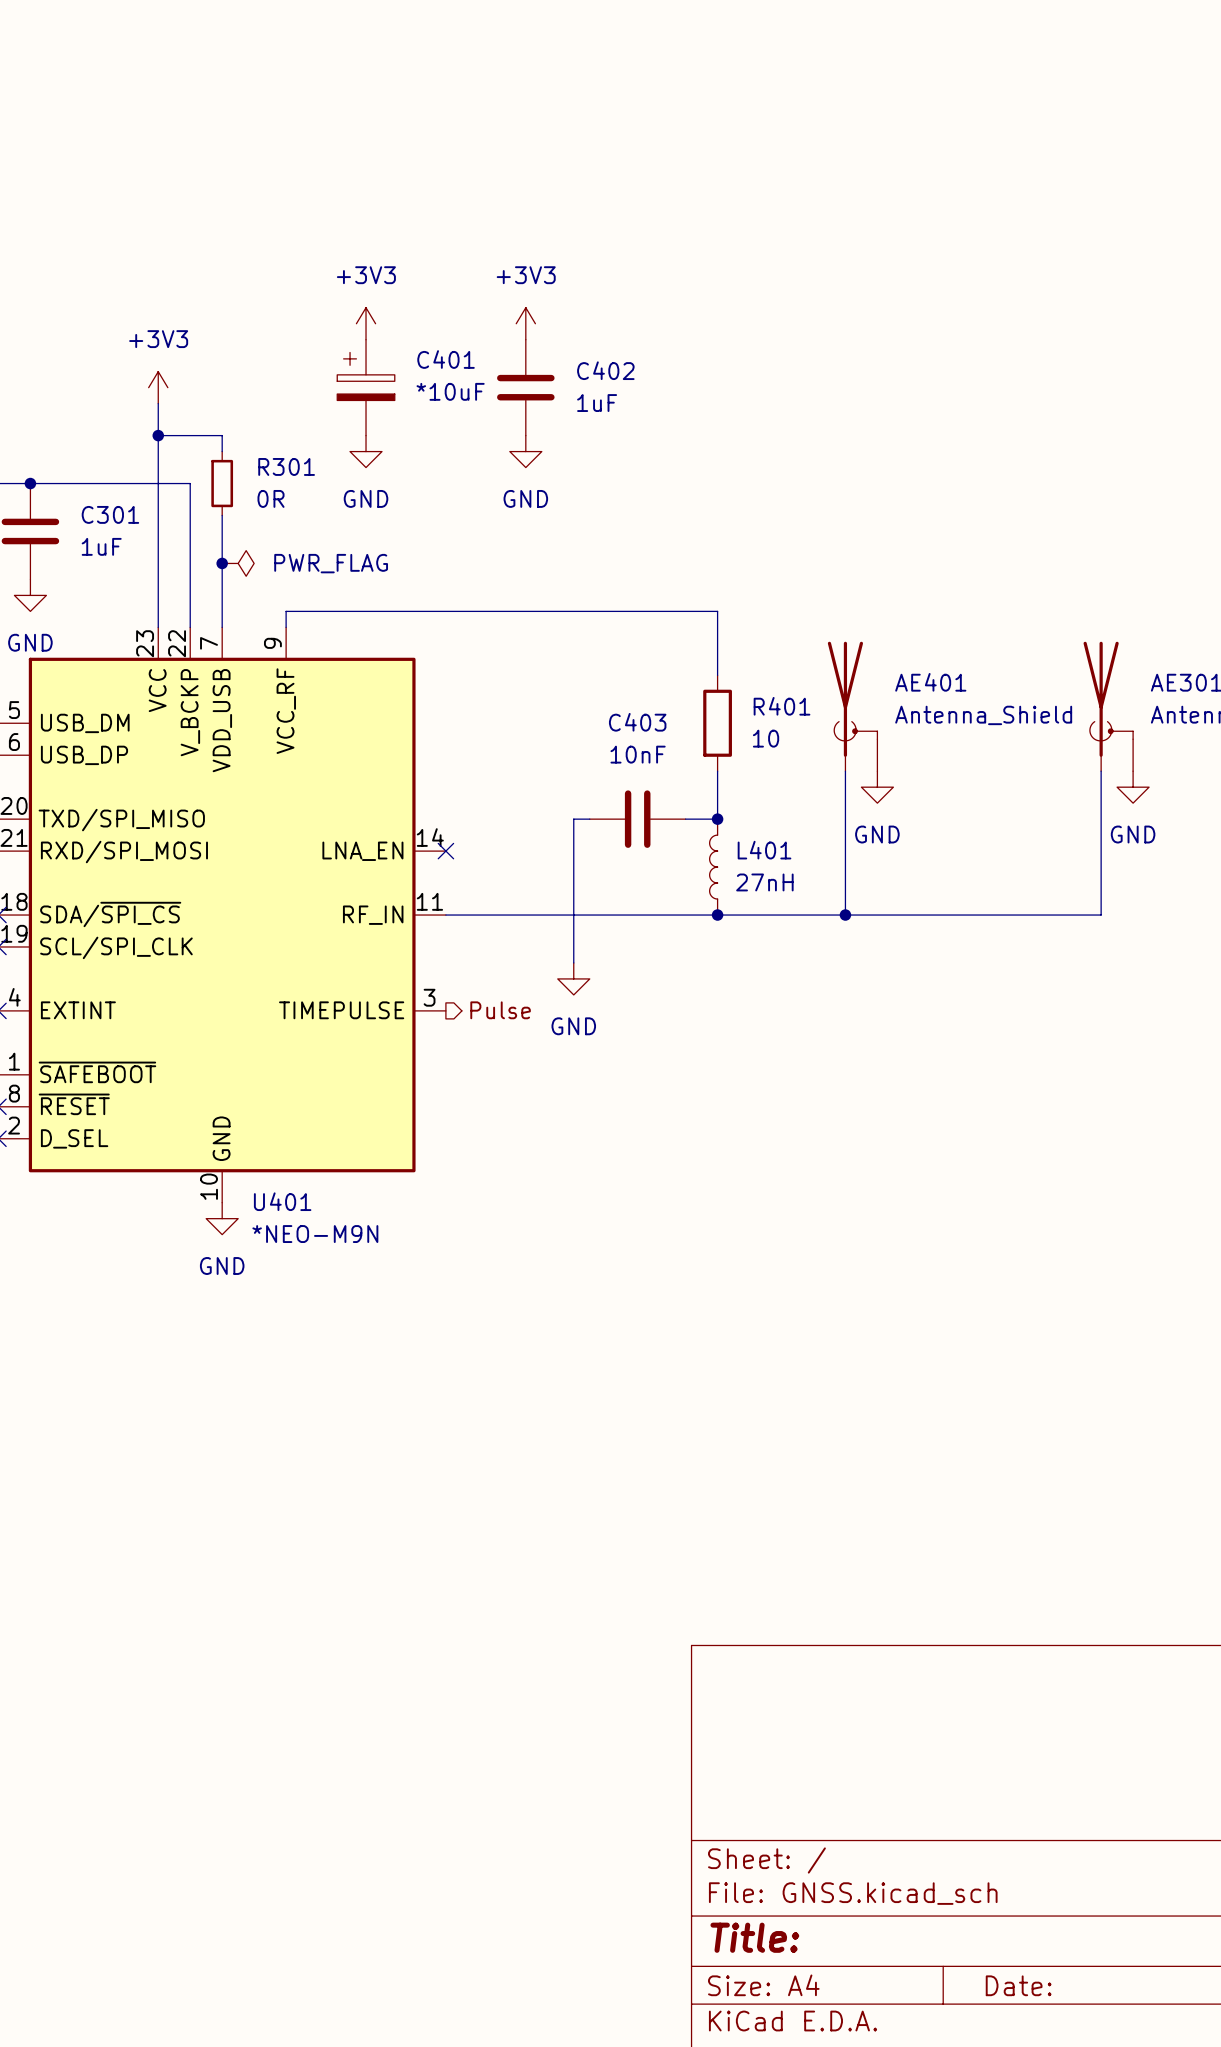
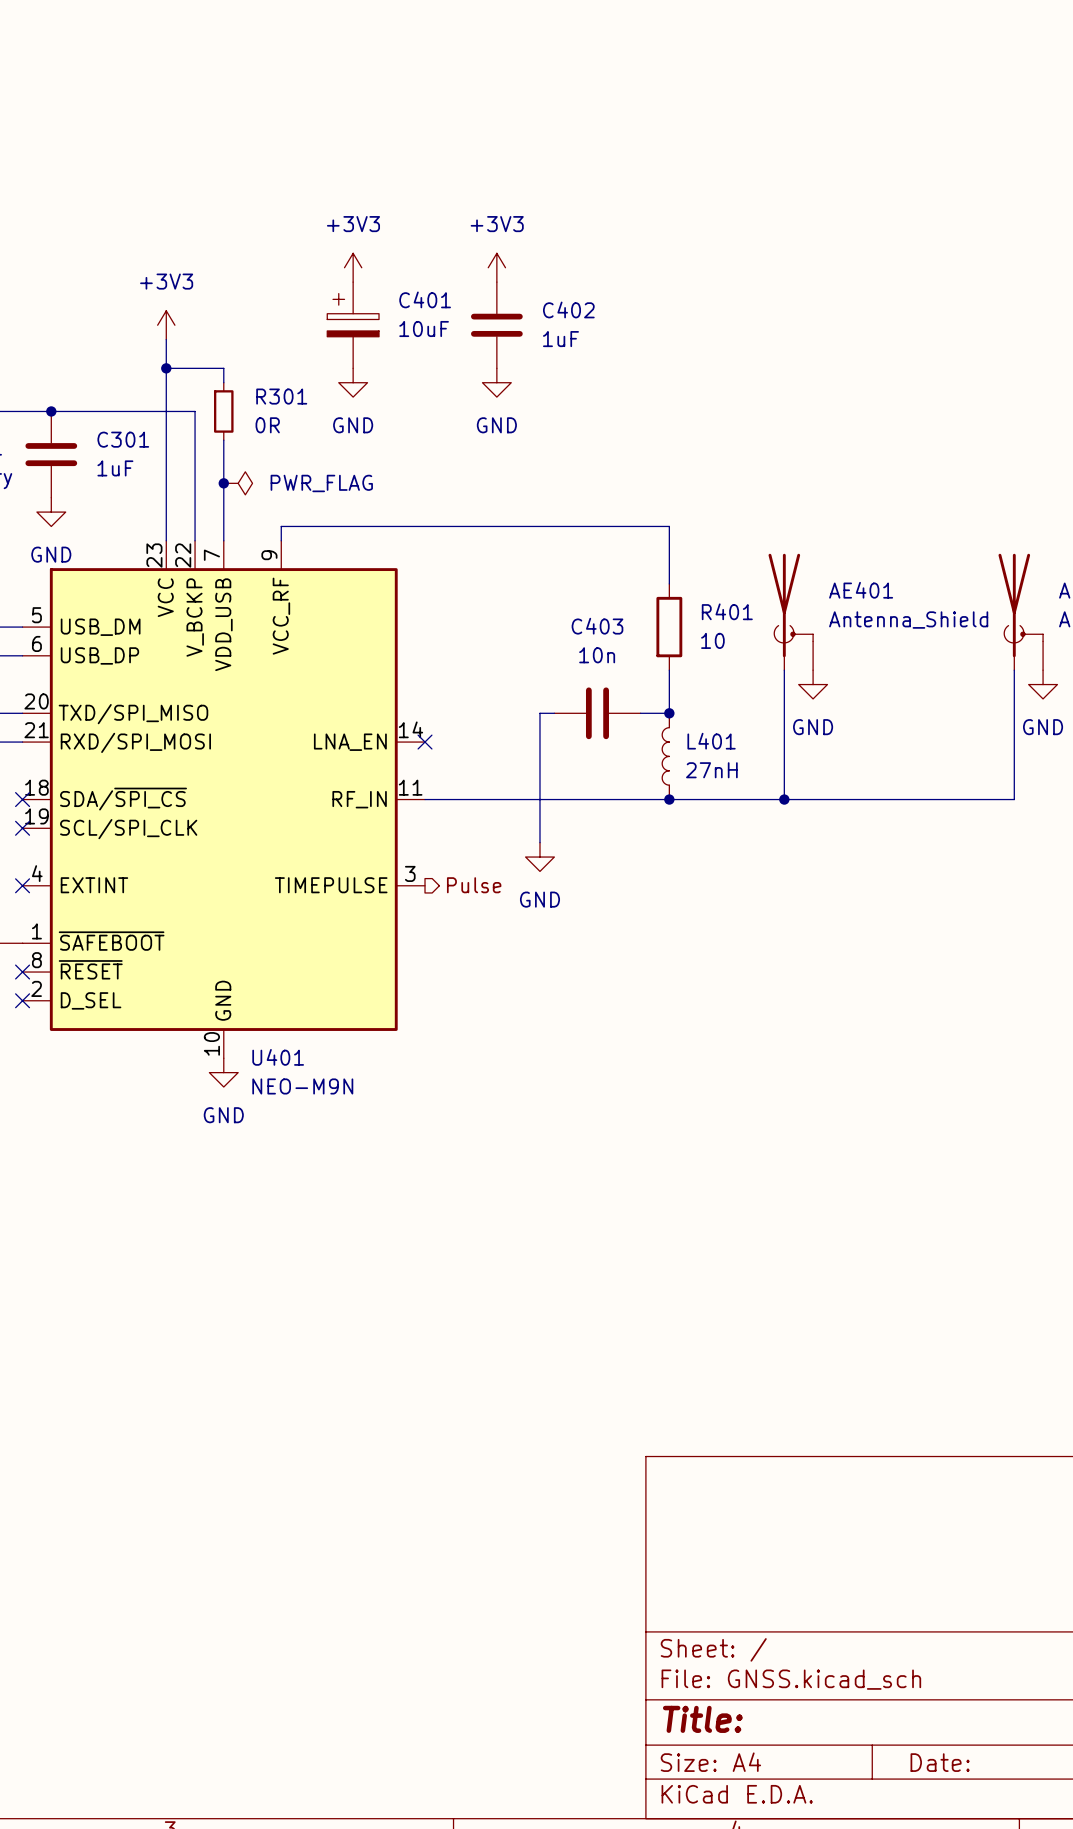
C401 value: *10uF (450, 391) -> 10uF (424, 329)
C403 value: 10nF (638, 754) -> 10n (597, 655)
U401 value: *NEO-M9N (315, 1234) -> NEO-M9N (302, 1086)

